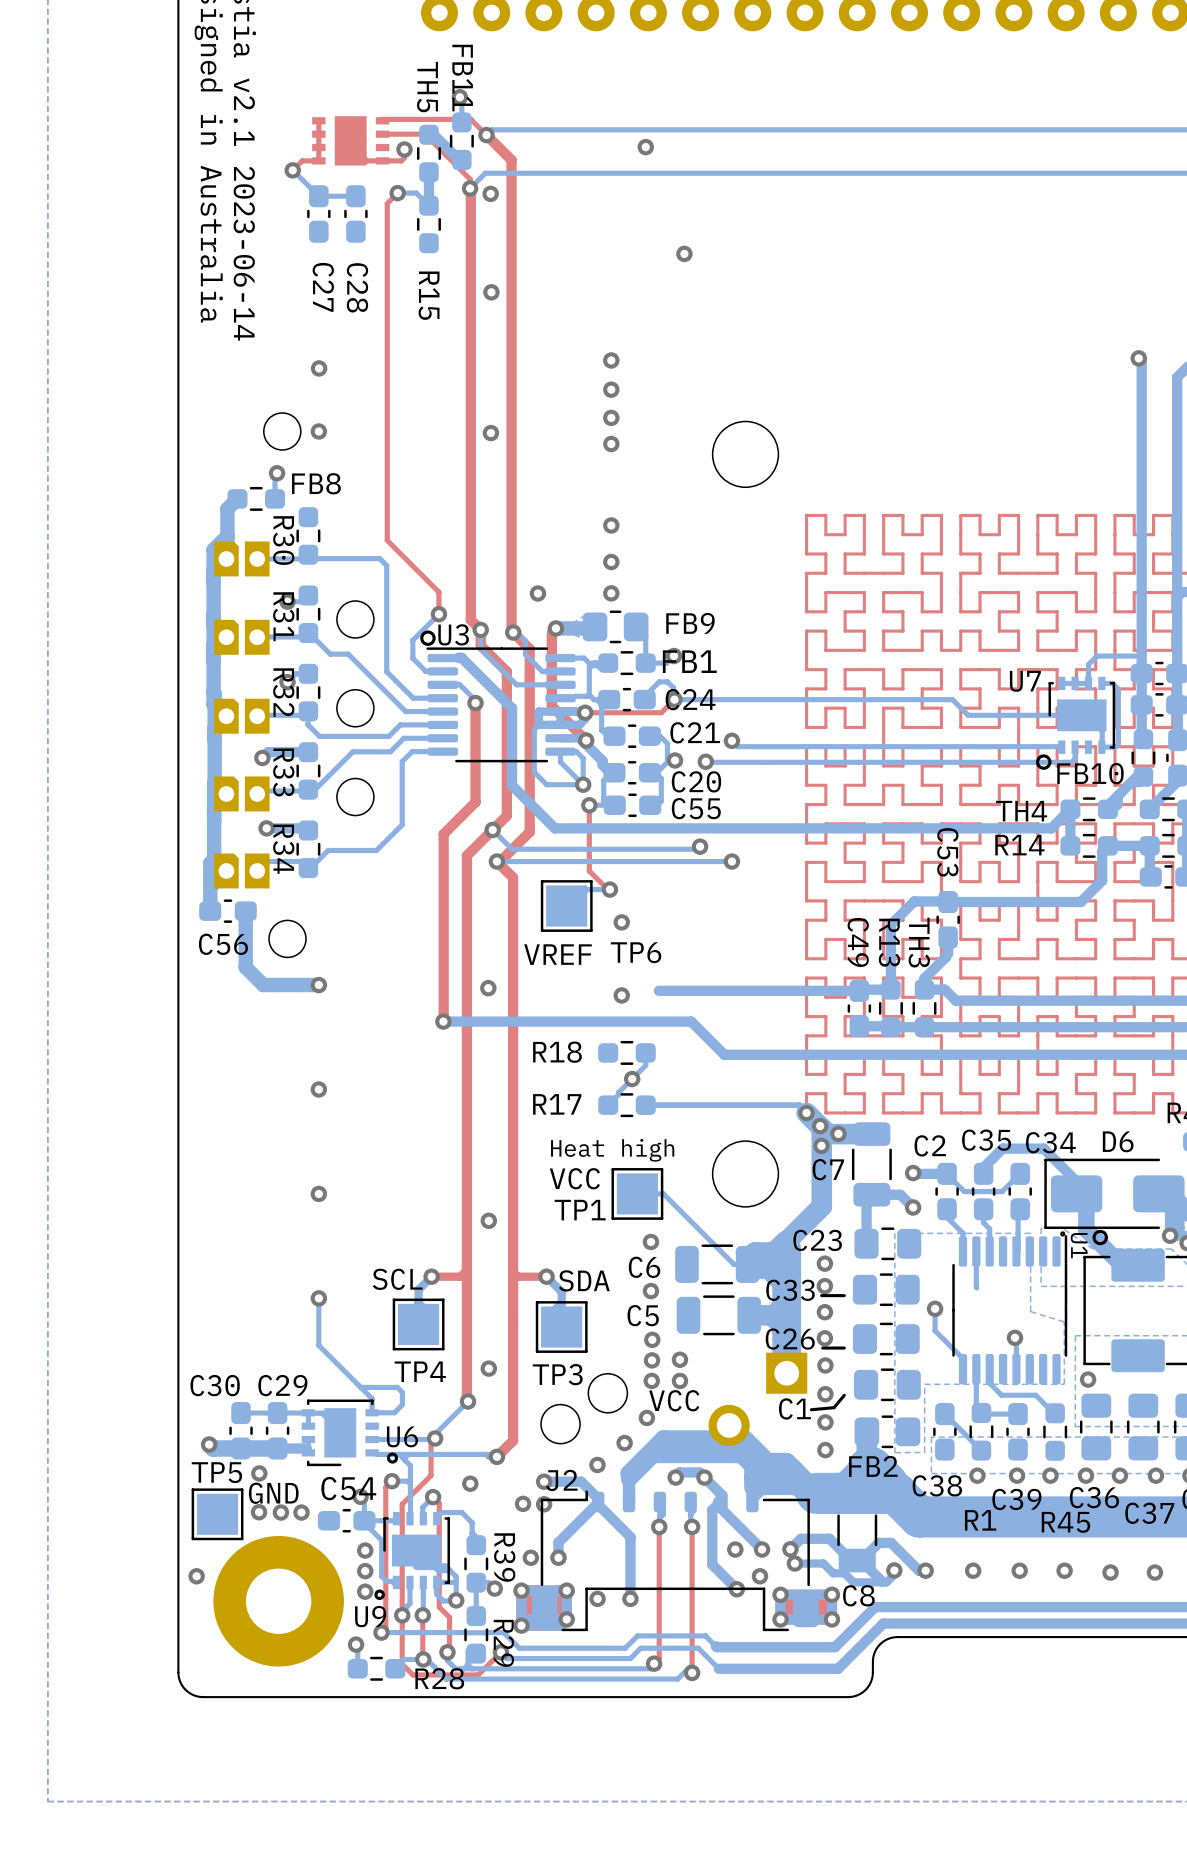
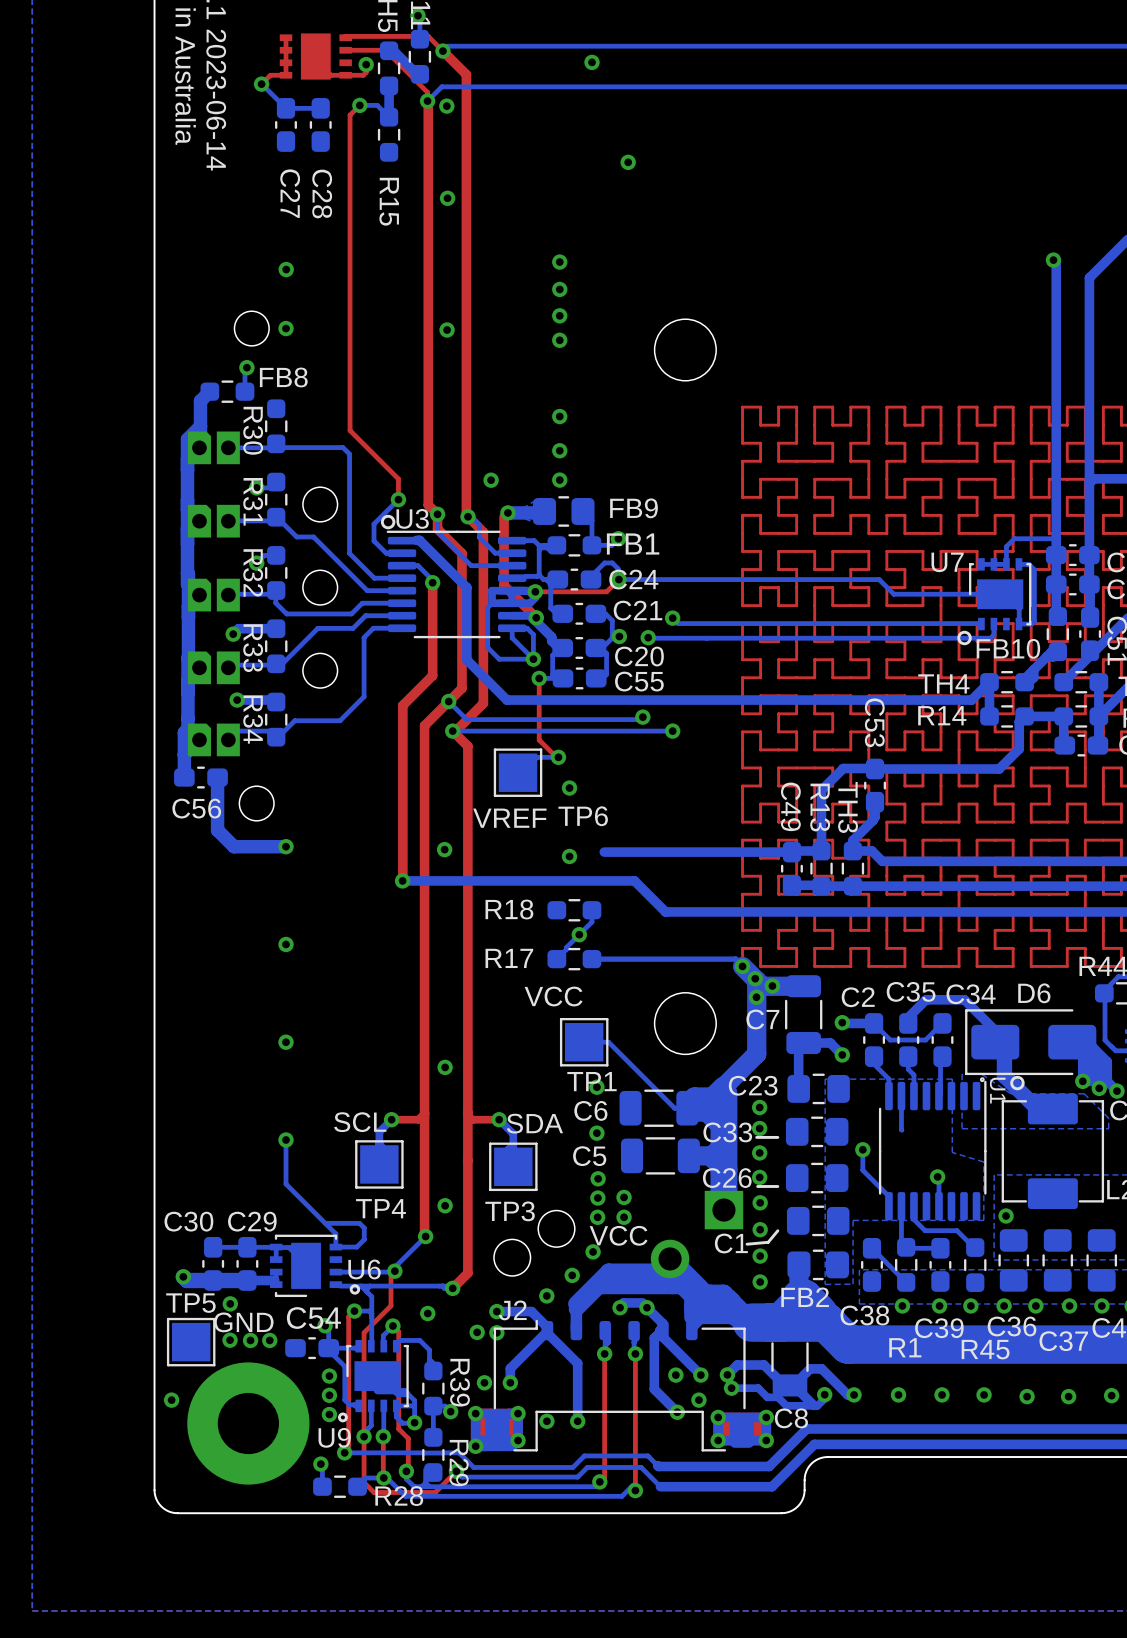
text: Heat high (612, 1150) -> none
text position: VCC (574, 1178) -> VCC (553, 996)
TP1 name position: TP1 (580, 1210) -> TP1 (591, 1081)

